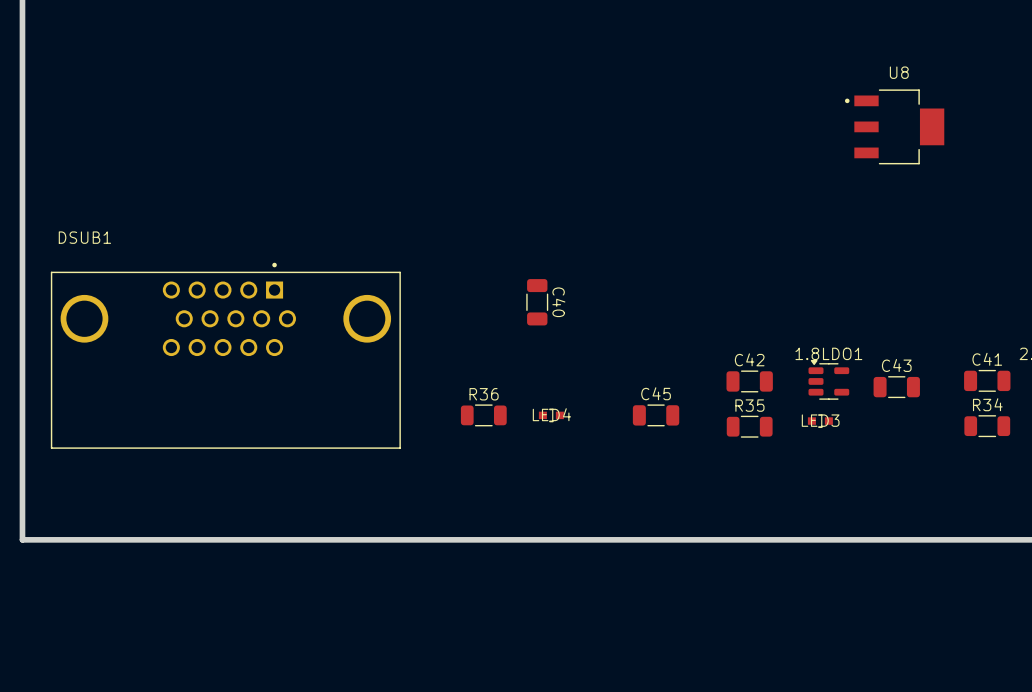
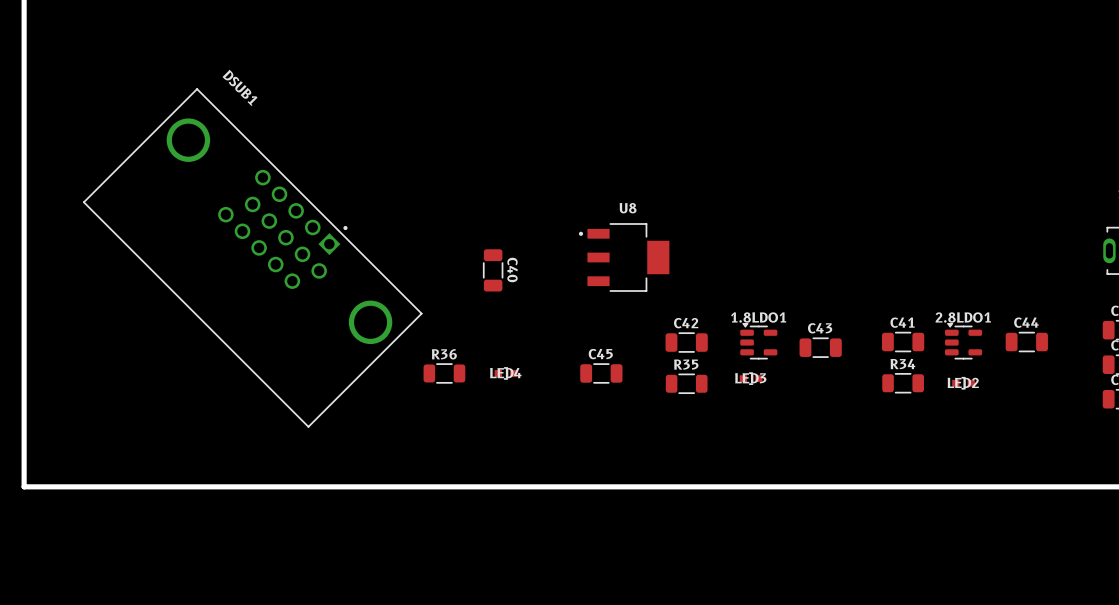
U8 position: (894, 126) -> (624, 257)
DSUB1 rotation: 0° (225, 355) -> 45° clockwise (252, 257)

